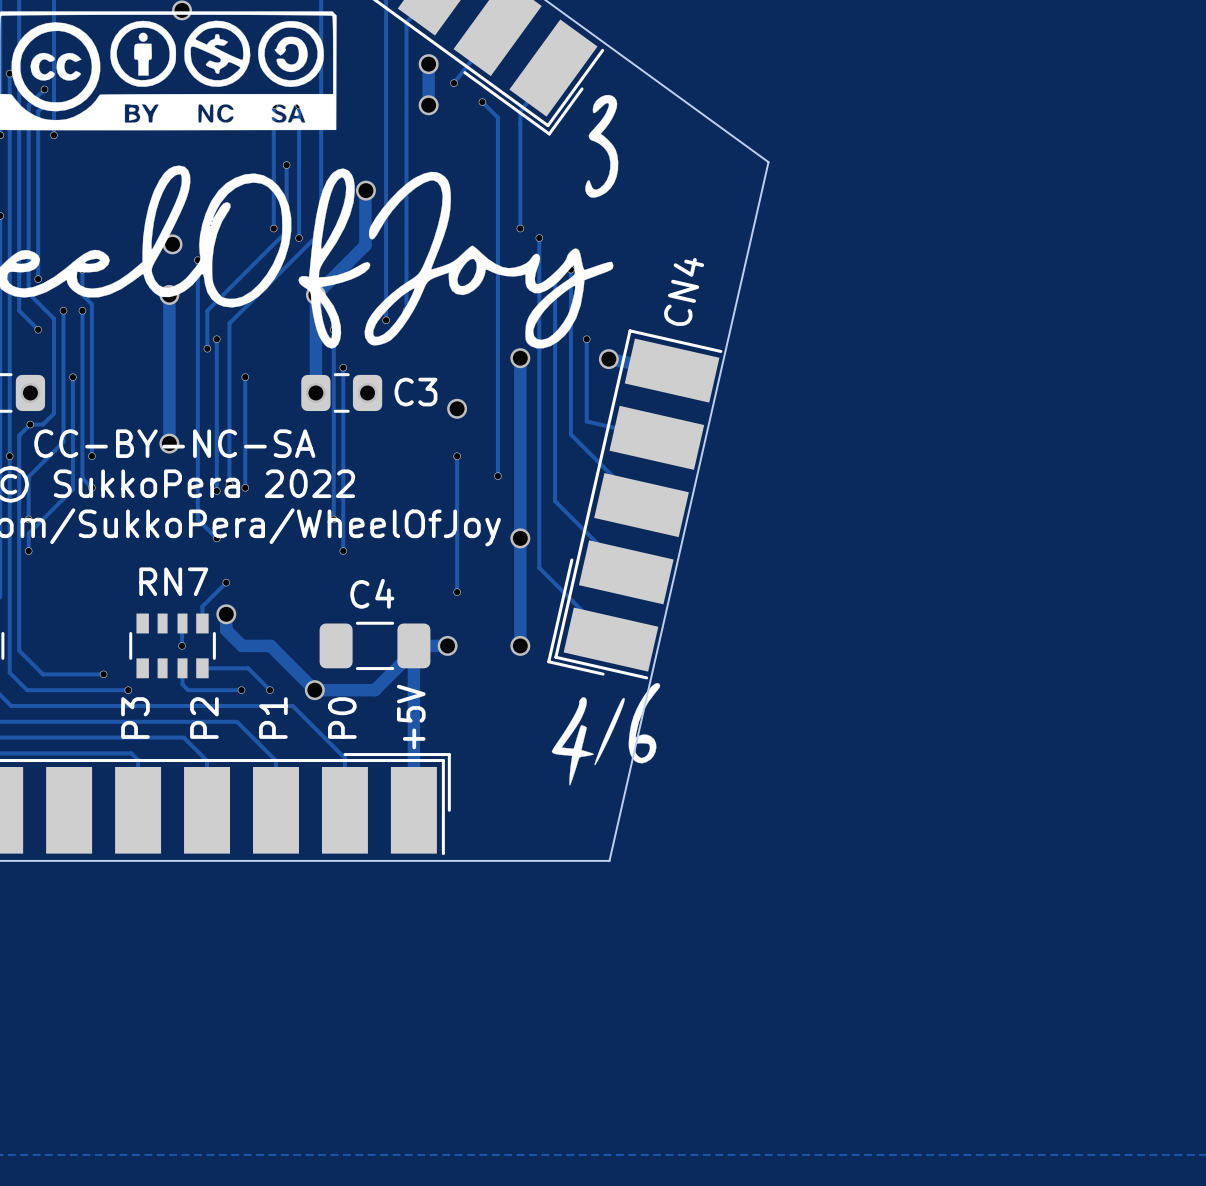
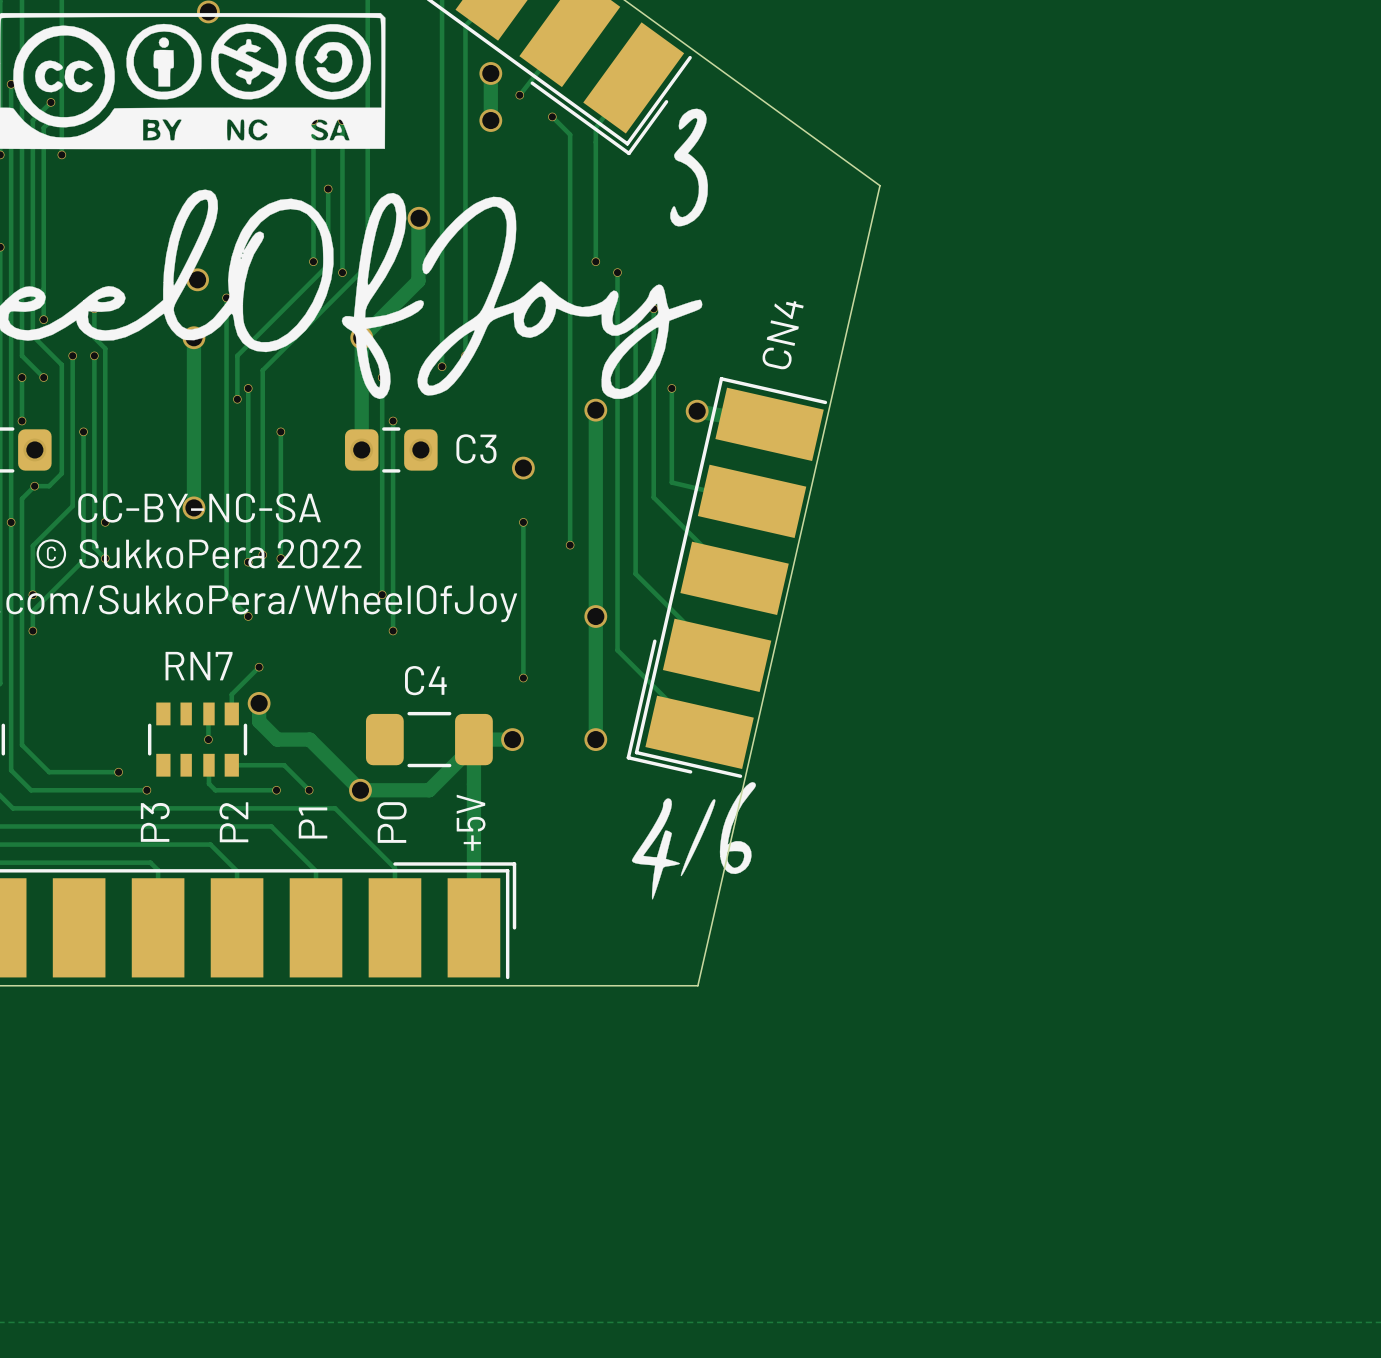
track: none -> (21, 377) (21, 421)
via: none -> (21, 377)
via: none -> (21, 421)

